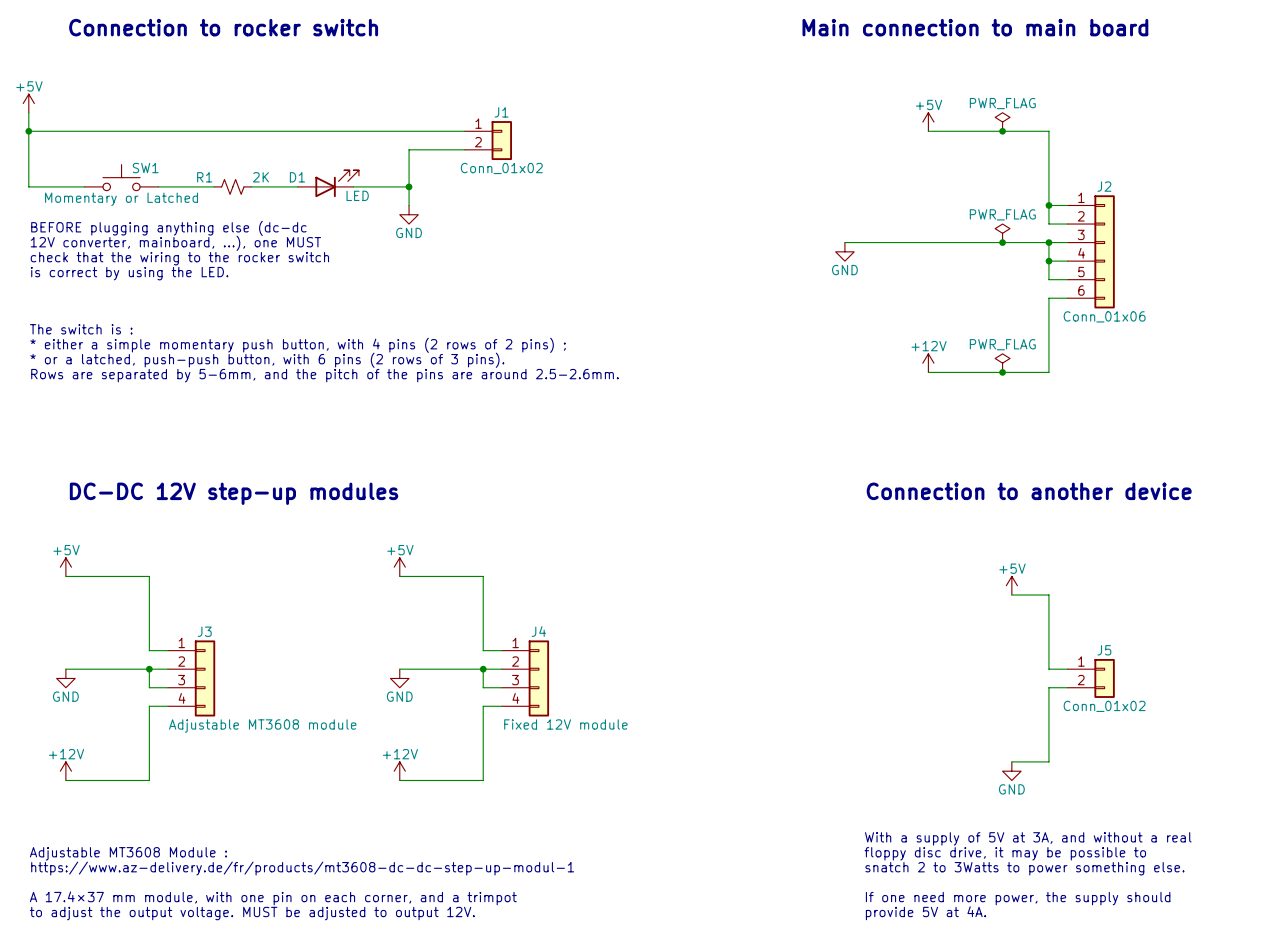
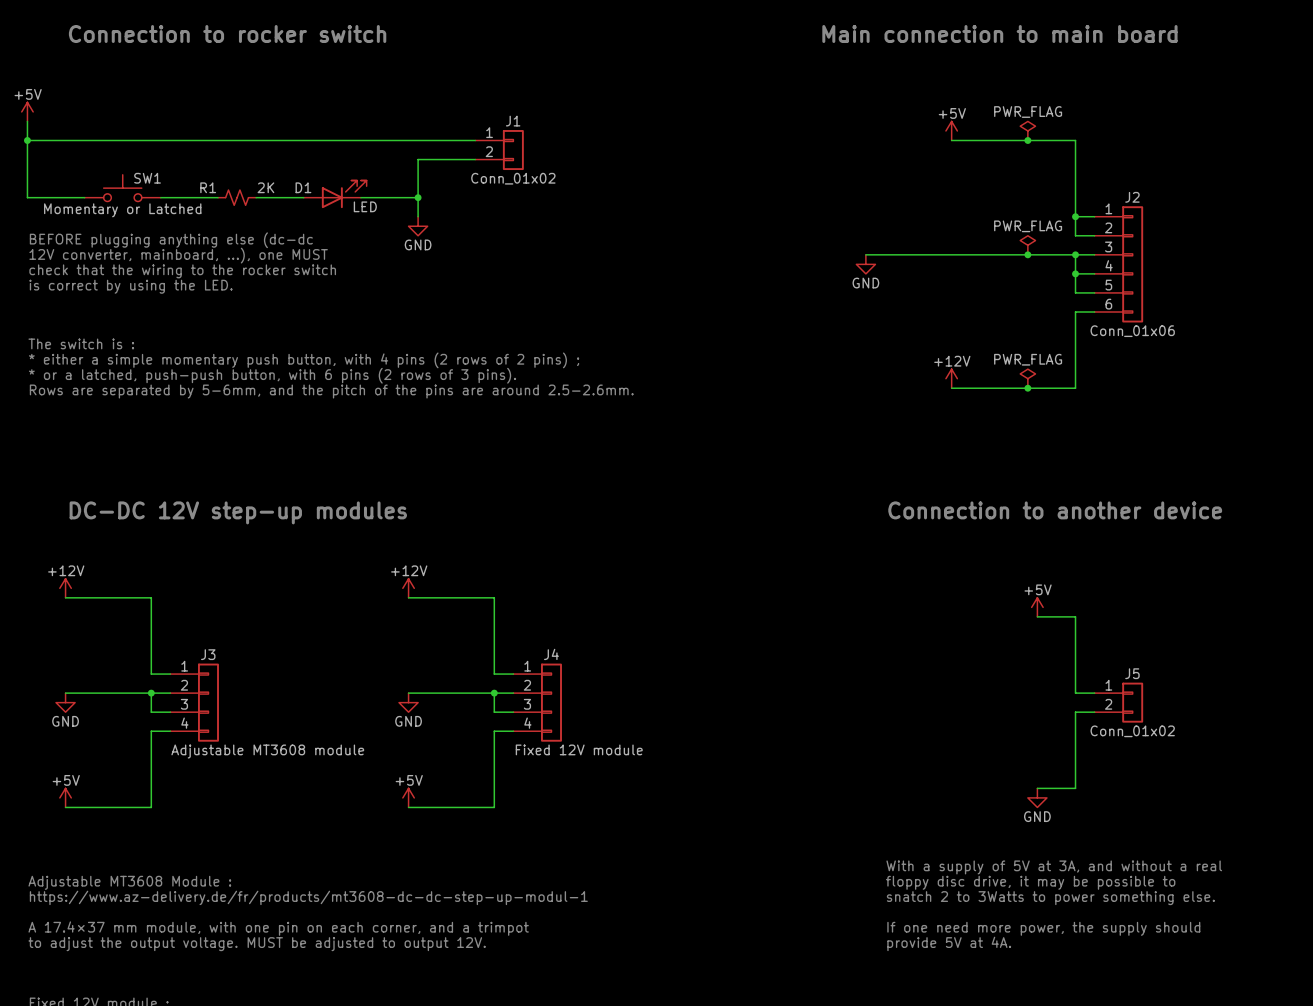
power symbol: +5V (65, 567) -> +12V (65, 588)
power symbol: +5V (399, 567) -> +12V (408, 588)
power symbol: +12V (65, 771) -> +5V (65, 797)
power symbol: +12V (399, 771) -> +5V (408, 797)

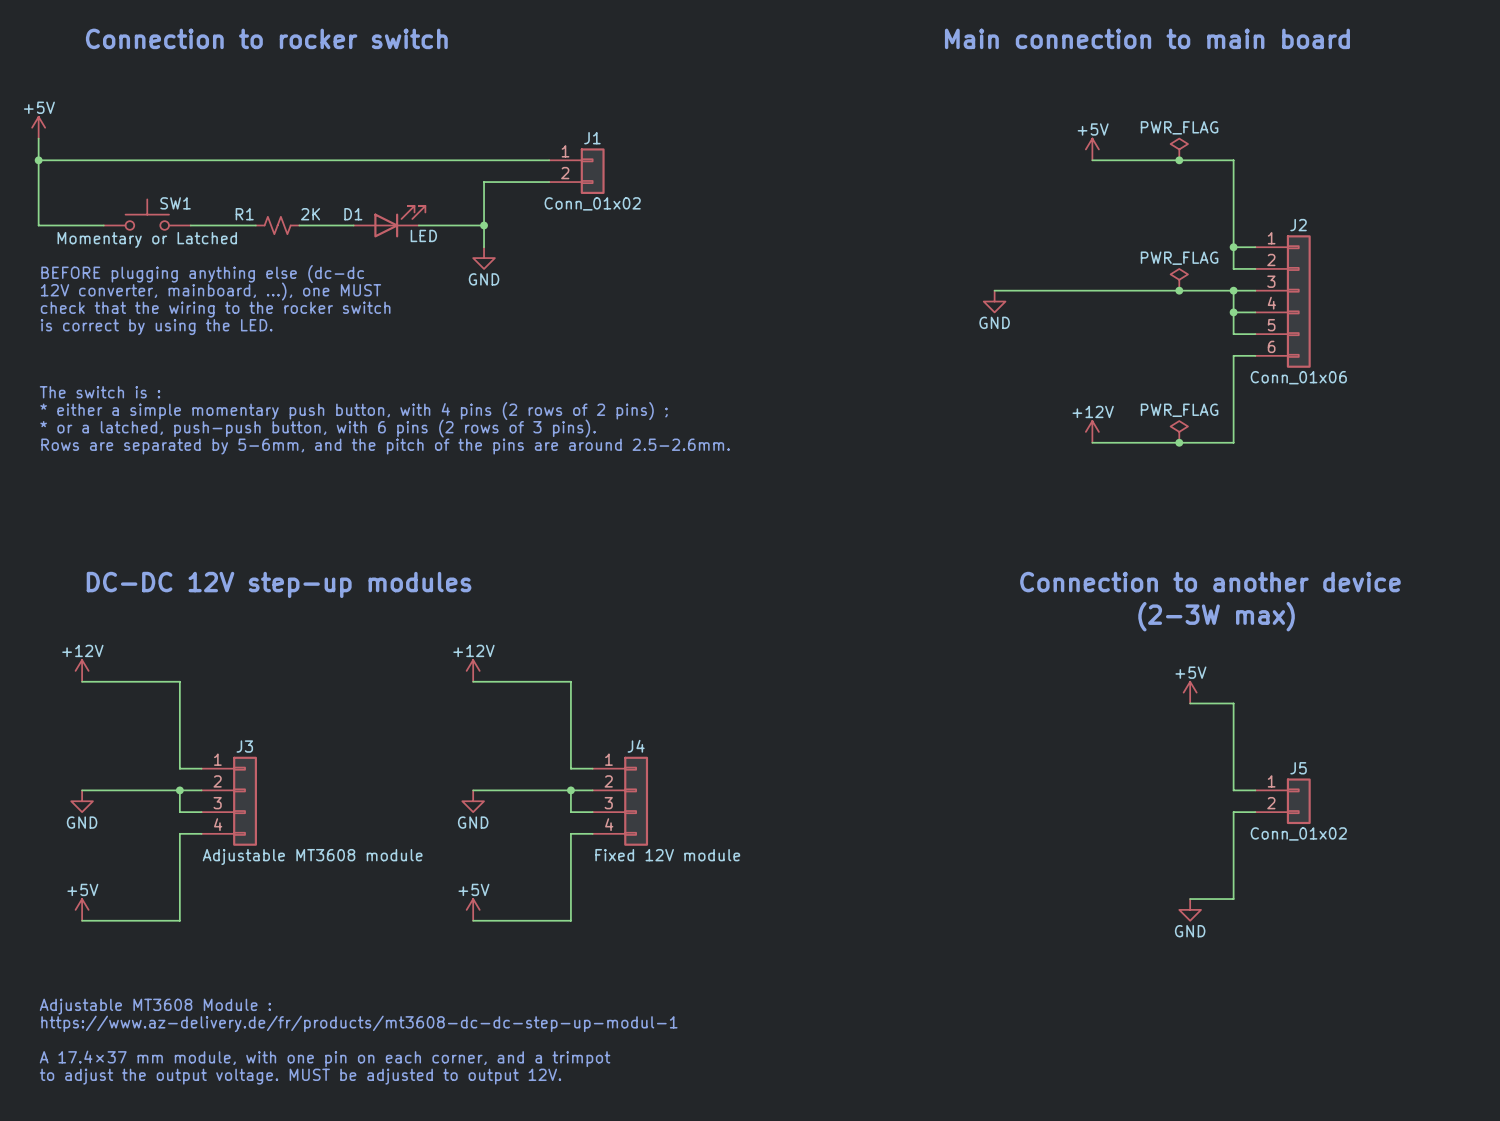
text: none -> (2-3W max) (1216, 616)
text: With a supply of 5V at 3A, and without a real (1054, 867) -> none
text: floppy disc drive, it may be possible to (1030, 882) -> none
text: snatch 2 to 3Watts to power something else. (1050, 898) -> none
text: If one need more power, the supply should (1043, 928) -> none
text: provide 5V at 4A. (949, 943) -> none

